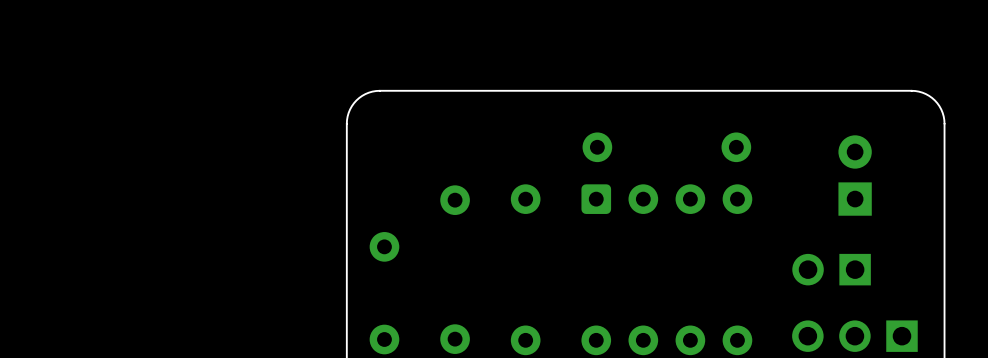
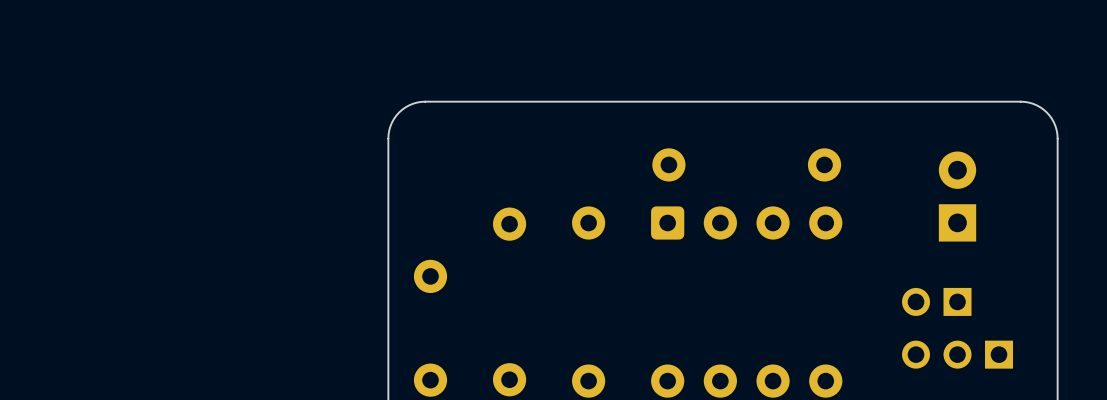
part footprint: [792, 253, 871, 286] -> [902, 287, 972, 316]
part: none -> (957, 354)
part: (854, 336) -> none

